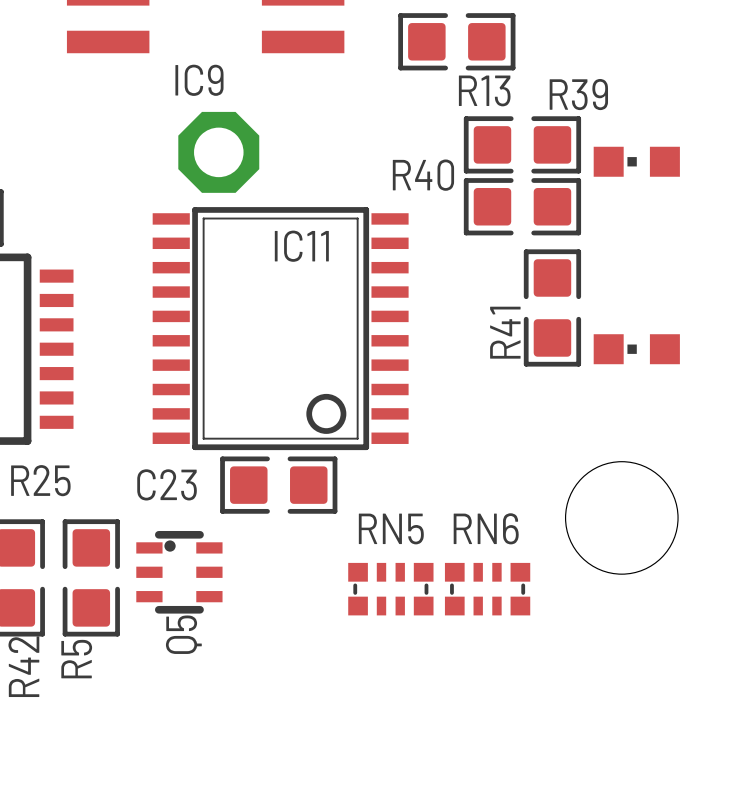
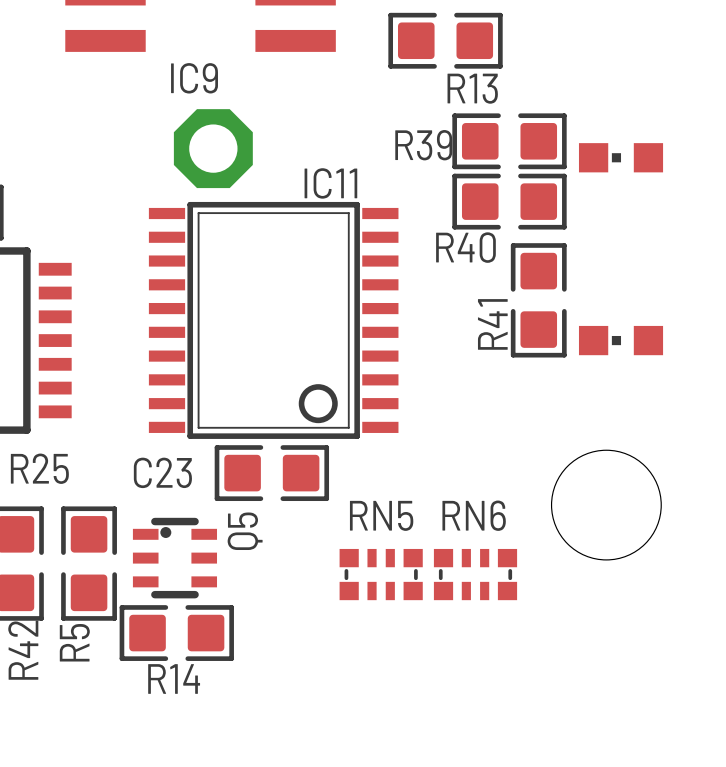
R39 name position: R39 (578, 94) -> R39 (423, 145)
R40 name position: R40 (423, 175) -> R40 (465, 247)
IC11 name position: IC11 (301, 246) -> IC11 (330, 183)
Q5 name position: Q5 (183, 634) -> Q5 (245, 531)
R14: none -> (176, 633)

